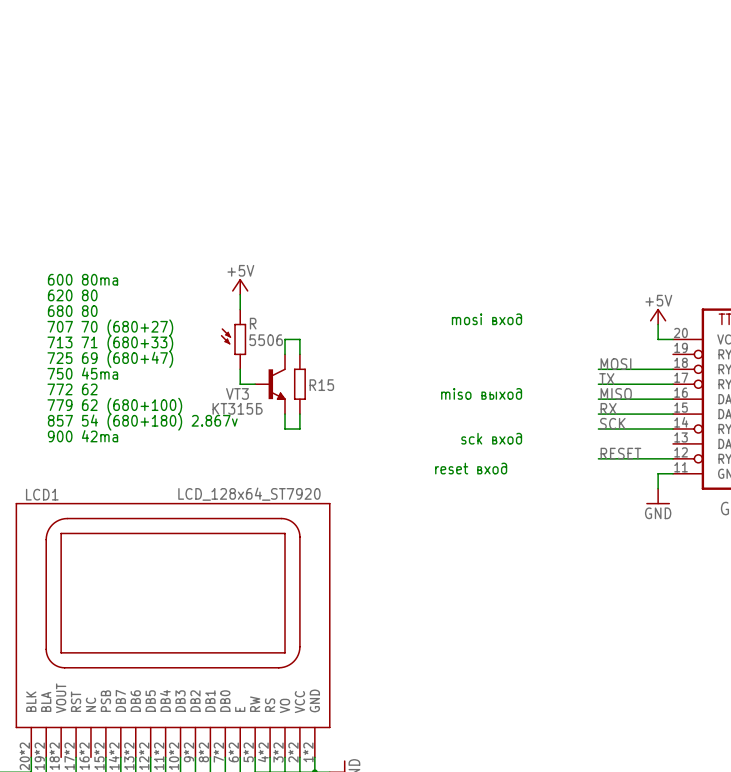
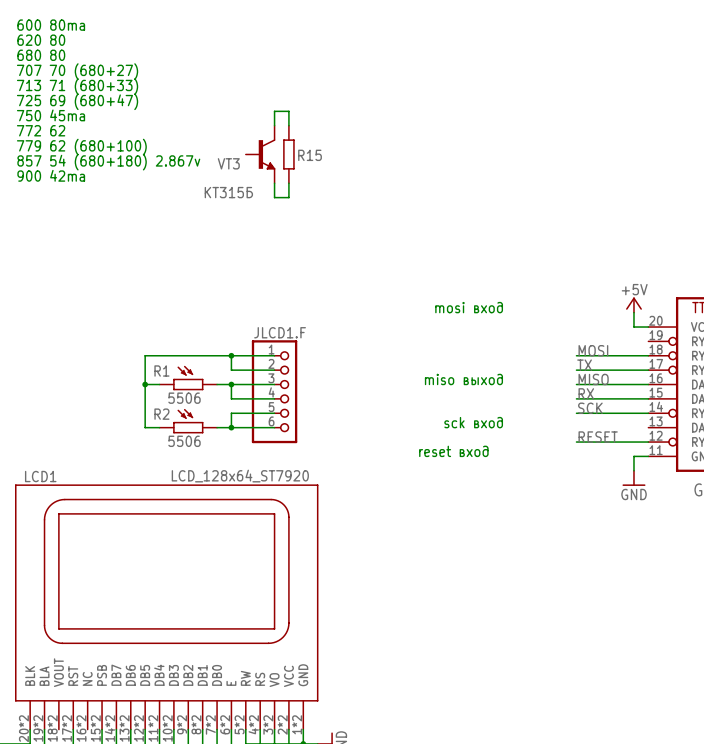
text: none -> 600 80ma (51, 25)
text: none -> 620 80 (41, 40)
text: none -> 680 80 (41, 55)
text: none -> 707 70 (680+27) (77, 71)
text: none -> 713 71 (680+33) (77, 86)
text: none -> 725 69 (680+47) (77, 101)
text: none -> 750 45ma (51, 115)
wire: none -> (274, 125) (274, 111) (288, 111) (288, 125)
text: none -> 772 62 (41, 130)
text: none -> 779 62 (680+100) (81, 147)
text: none -> 857 54 (680+180) 2.867v (108, 162)
text: none -> 900 42ma (51, 175)
wire: none -> (274, 183) (274, 197) (288, 197) (288, 183)
text: 600 80ma (83, 279) -> none
power symbol: +5V (240, 286) -> none
wire: (240, 294) (240, 309) -> none
text: 620 80 (72, 295) -> none
text: 680 80 (72, 311) -> none
text: 707 70 (680+27) (110, 328) -> none
R: 5506 (233, 339) -> none
text: 713 71 (680+33) (110, 343) -> none
wire: (285, 354) (285, 339) (299, 339) (299, 354) -> none
text: 725 69 (680+47) (110, 359) -> none
junction: none -> (231, 355)
wire: none -> (274, 355) (145, 355) (145, 427) (159, 427)
text: 750 45ma (82, 373) -> none
VT3 position: (270, 384) -> (260, 154)
R15 position: (299, 384) -> (288, 154)
text: 772 62 (72, 389) -> none
R1: none -> 5506 (188, 378)
wire: none -> (145, 384) (159, 384)
junction: none -> (145, 384)
wire: none -> (217, 384) (274, 384)
junction: none -> (231, 384)
text: 779 62 (680+100) (114, 406) -> none
JLCD1.F: none -> (274, 391)
VT3 value position: КТ315Б (237, 408) -> КТ315Б (228, 192)
wire: (285, 414) (285, 429) (299, 429) (299, 414) -> (274, 398) (231, 398) (231, 384)
text: 857 54 (680+180) 2.867v (142, 422) -> none
wire: none -> (274, 413) (231, 413) (231, 427)
text: 900 42ma (83, 436) -> none
R2: none -> 5506 (188, 421)
wire: none -> (217, 427) (274, 427)
junction: none -> (231, 427)

